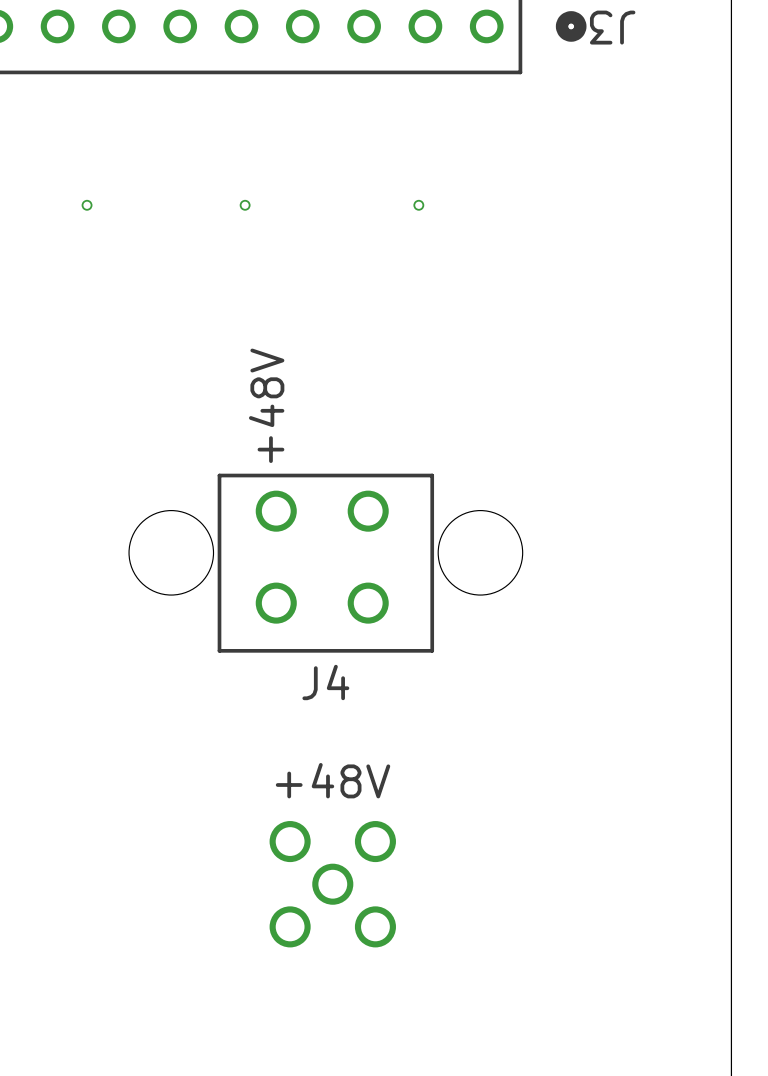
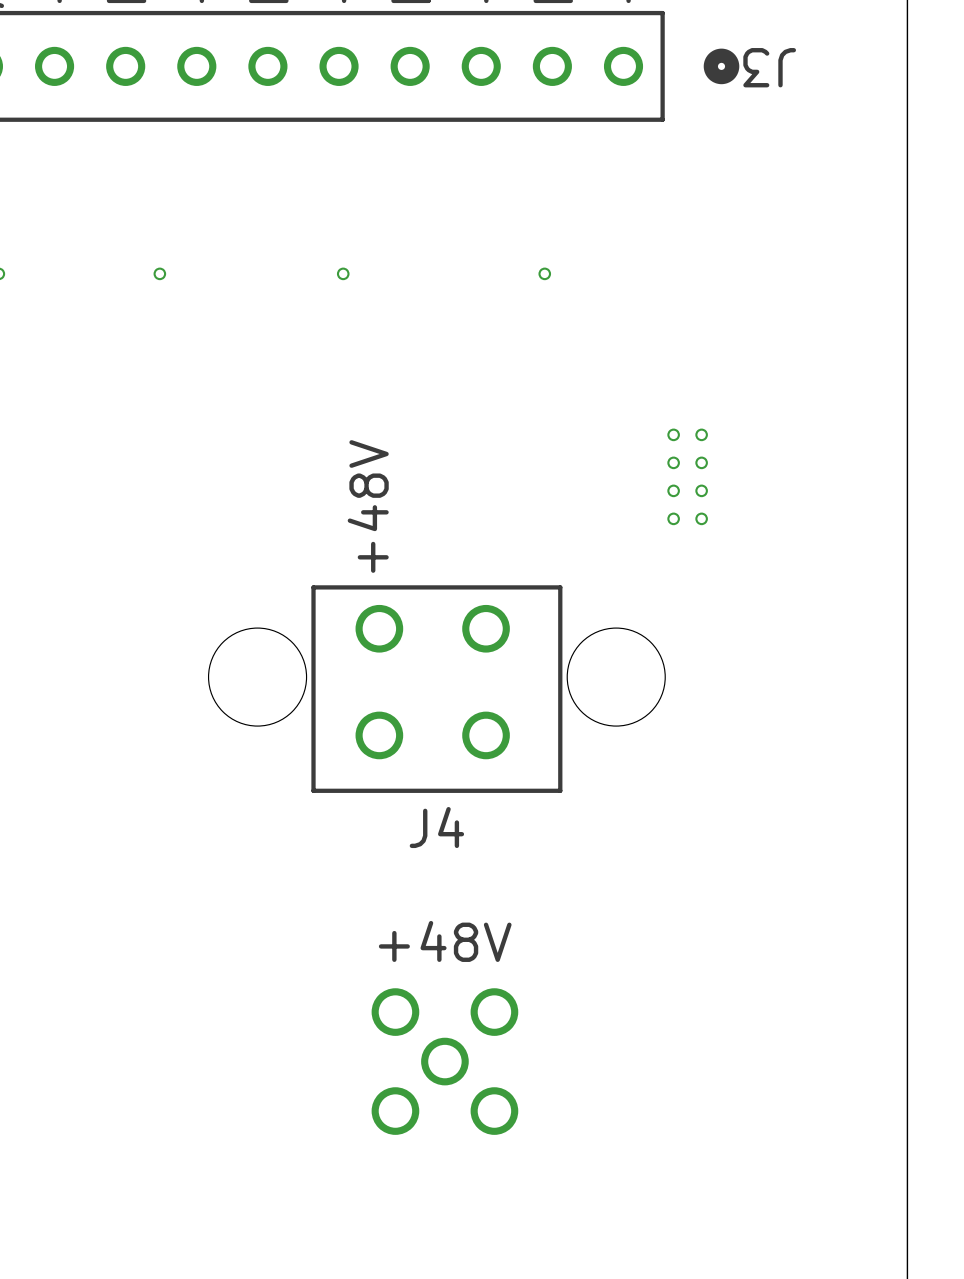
via: none -> (673, 434)
via: none -> (701, 434)
via: none -> (673, 462)
via: none -> (701, 462)
via: none -> (673, 490)
via: none -> (701, 490)
via: none -> (673, 518)
via: none -> (701, 518)

